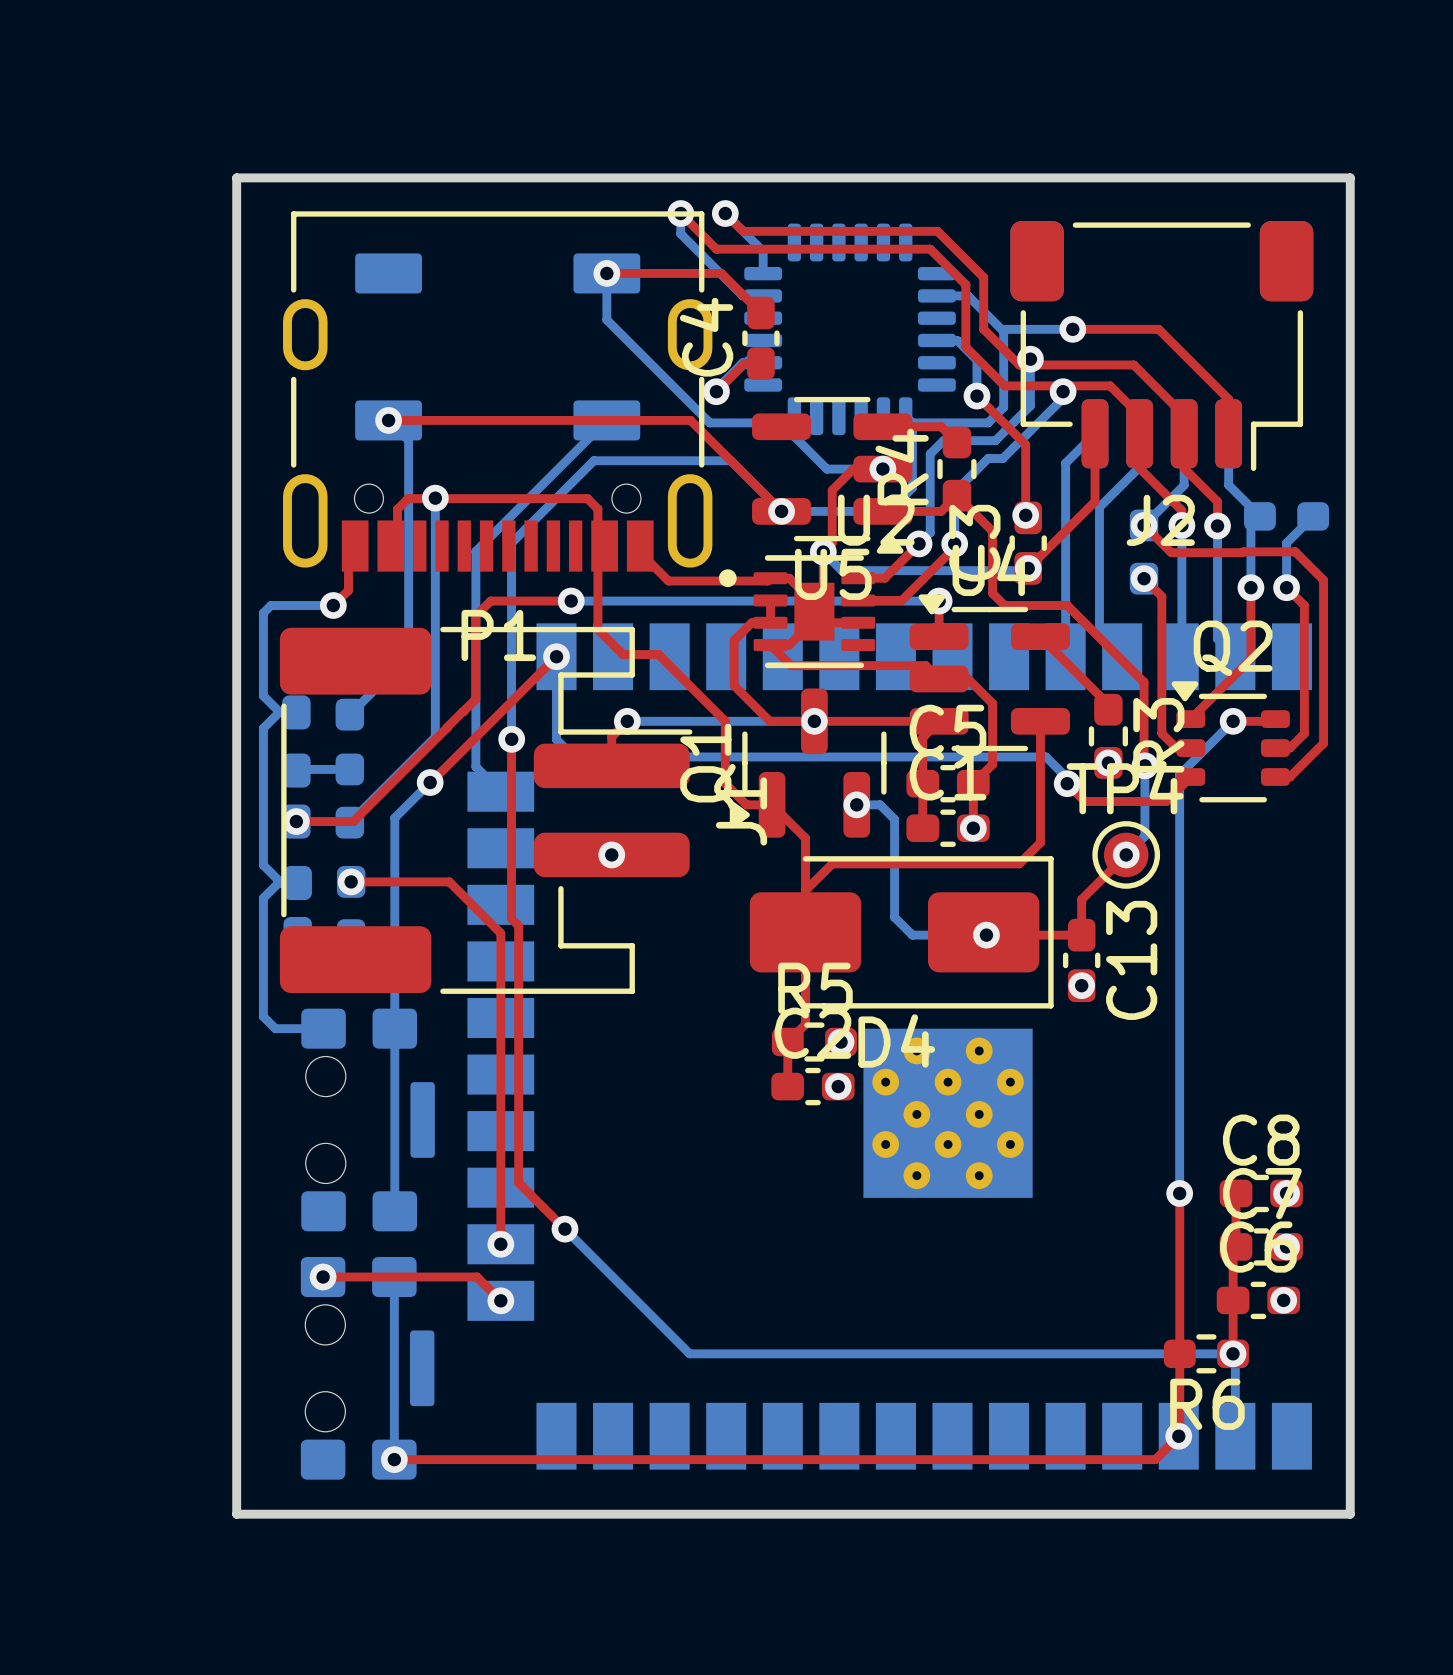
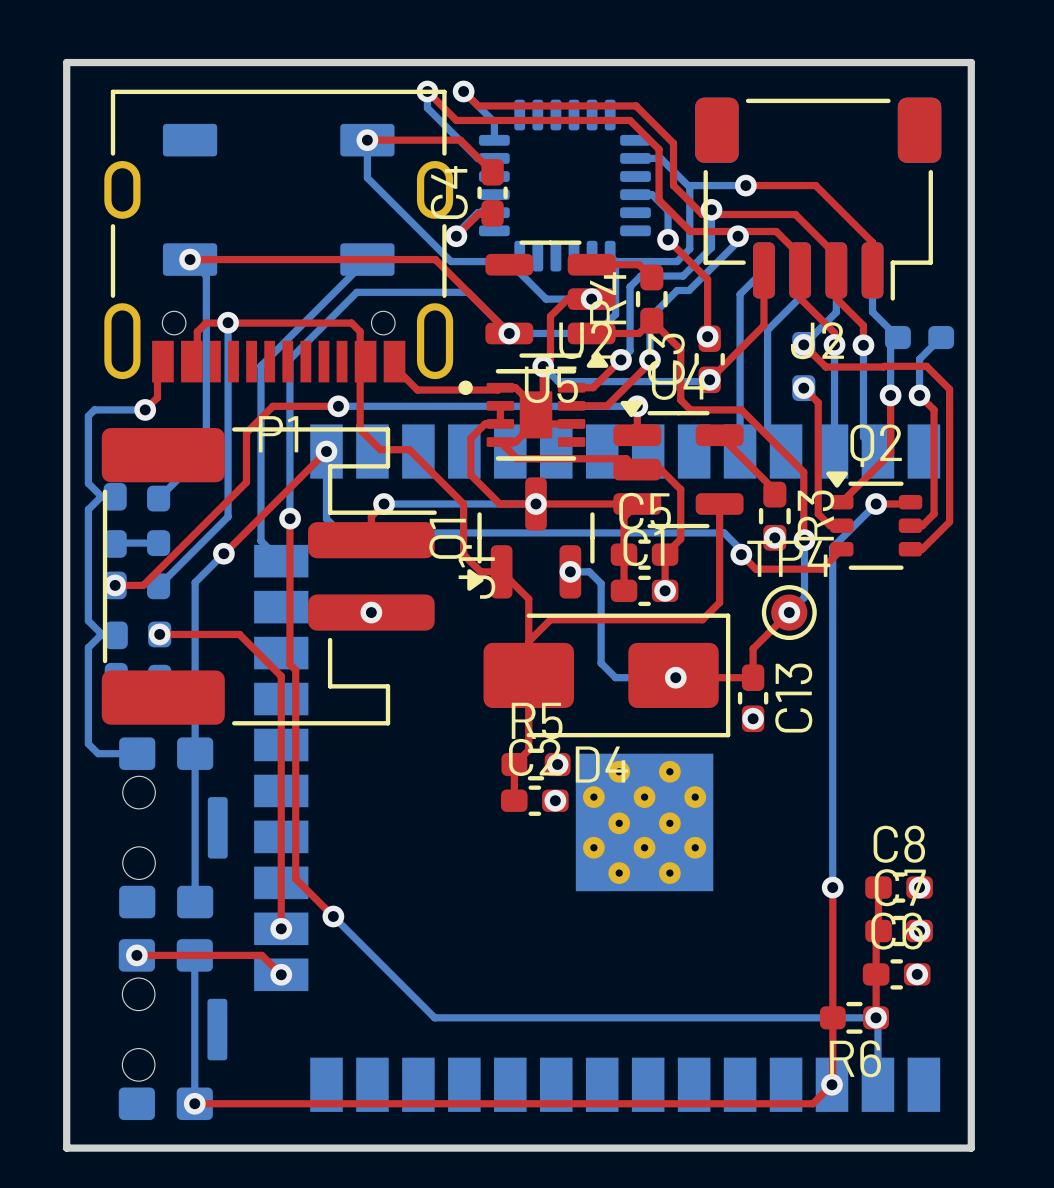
top track: (475, 615) (475, 699) (463, 711) -> none
top track: (463, 711) (447, 727) -> none
top track: (447, 727) (353, 821) (331, 821) -> (260, 418) (246, 432) (246, 482) (143, 585)

